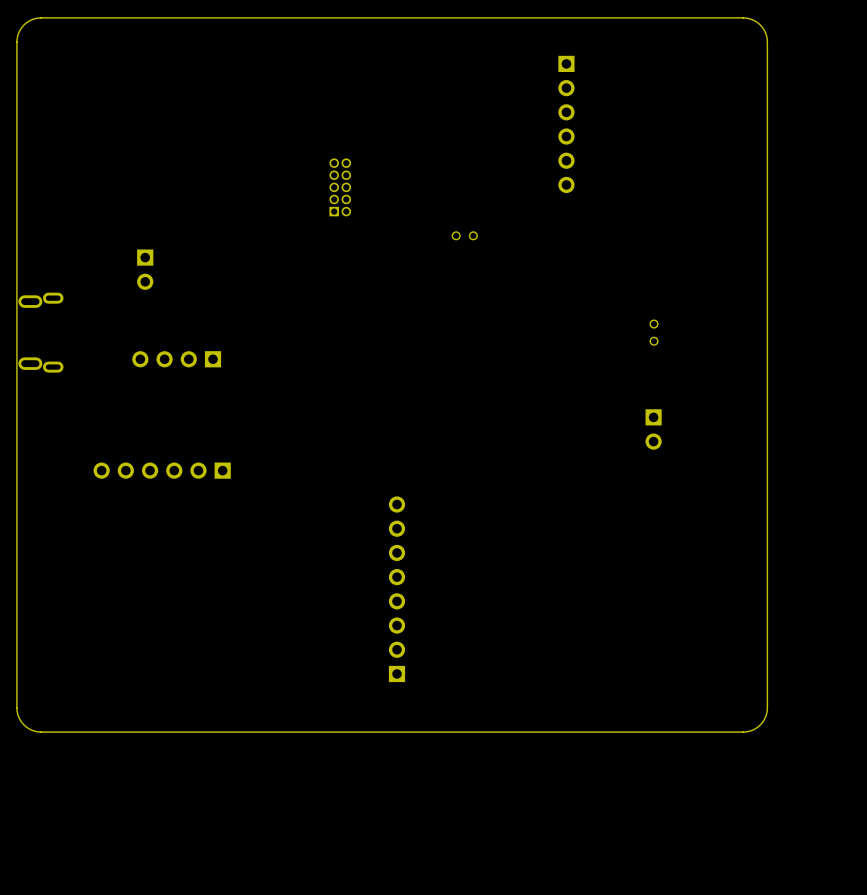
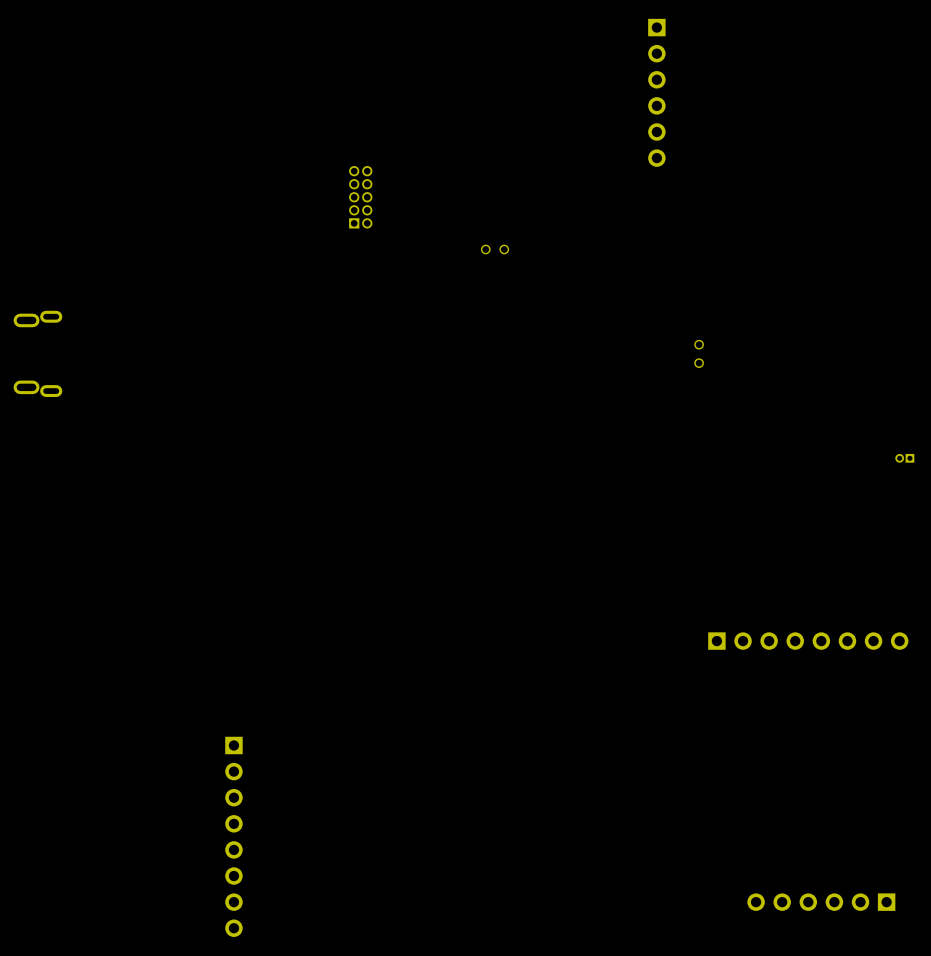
board edge: (743, 17) (41, 17) (31, 19) (24, 25) (18, 32) (16, 42) (16, 707) (18, 717) (24, 724) (31, 730) (41, 732) (743, 732) (752, 730) (760, 724) (765, 717) (767, 707) (767, 42) (765, 32) (760, 25) (752, 19) (743, 17) -> none
part position: (566, 124) -> (656, 92)
part: (145, 269) -> none
part: (176, 359) -> none
part: (653, 429) -> none
part: none -> (904, 458)
part: (162, 470) -> none
part: (396, 589) -> none
part: none -> (808, 641)
part: none -> (233, 836)
part: none -> (821, 902)

